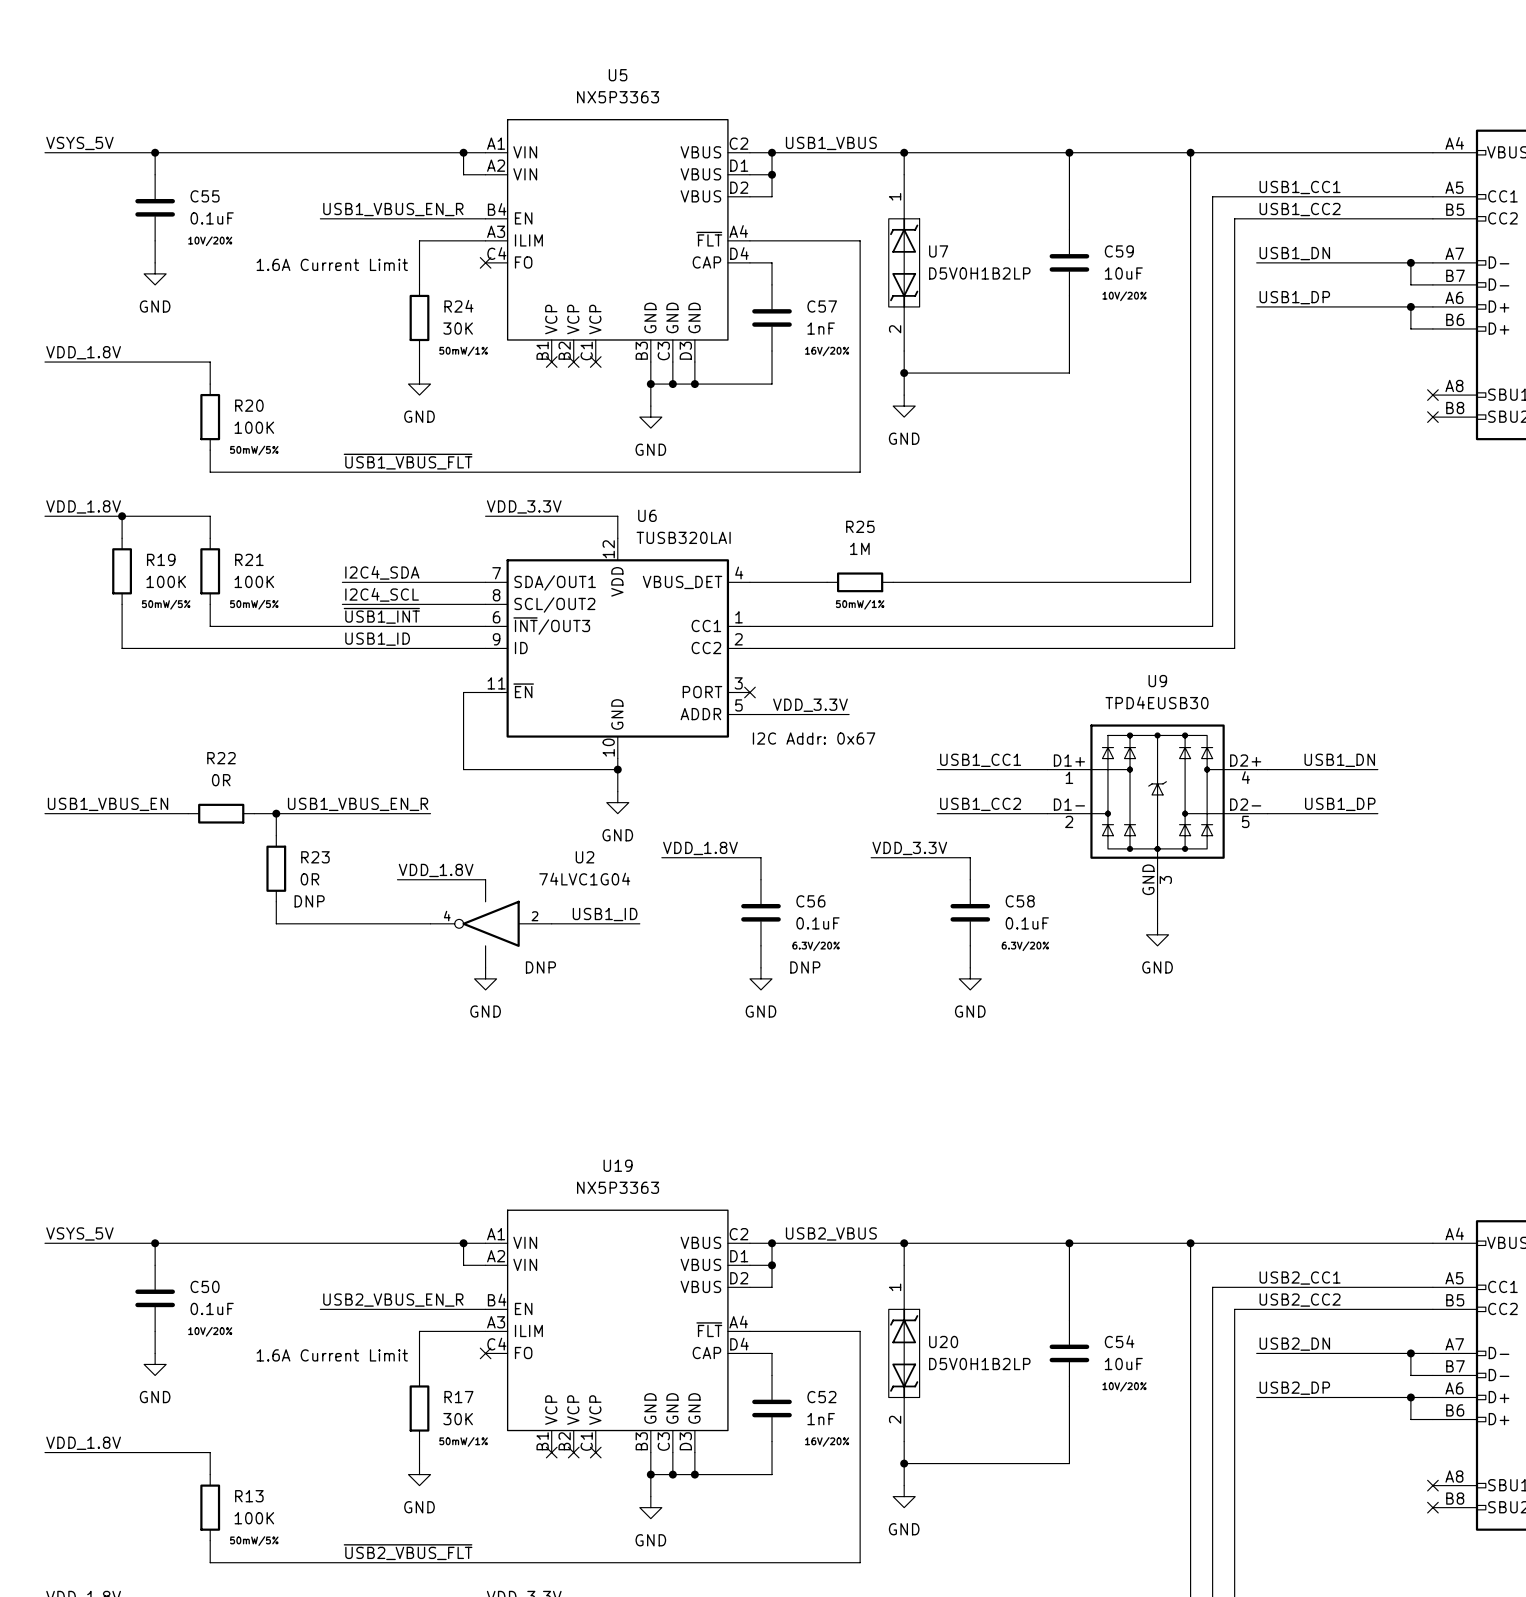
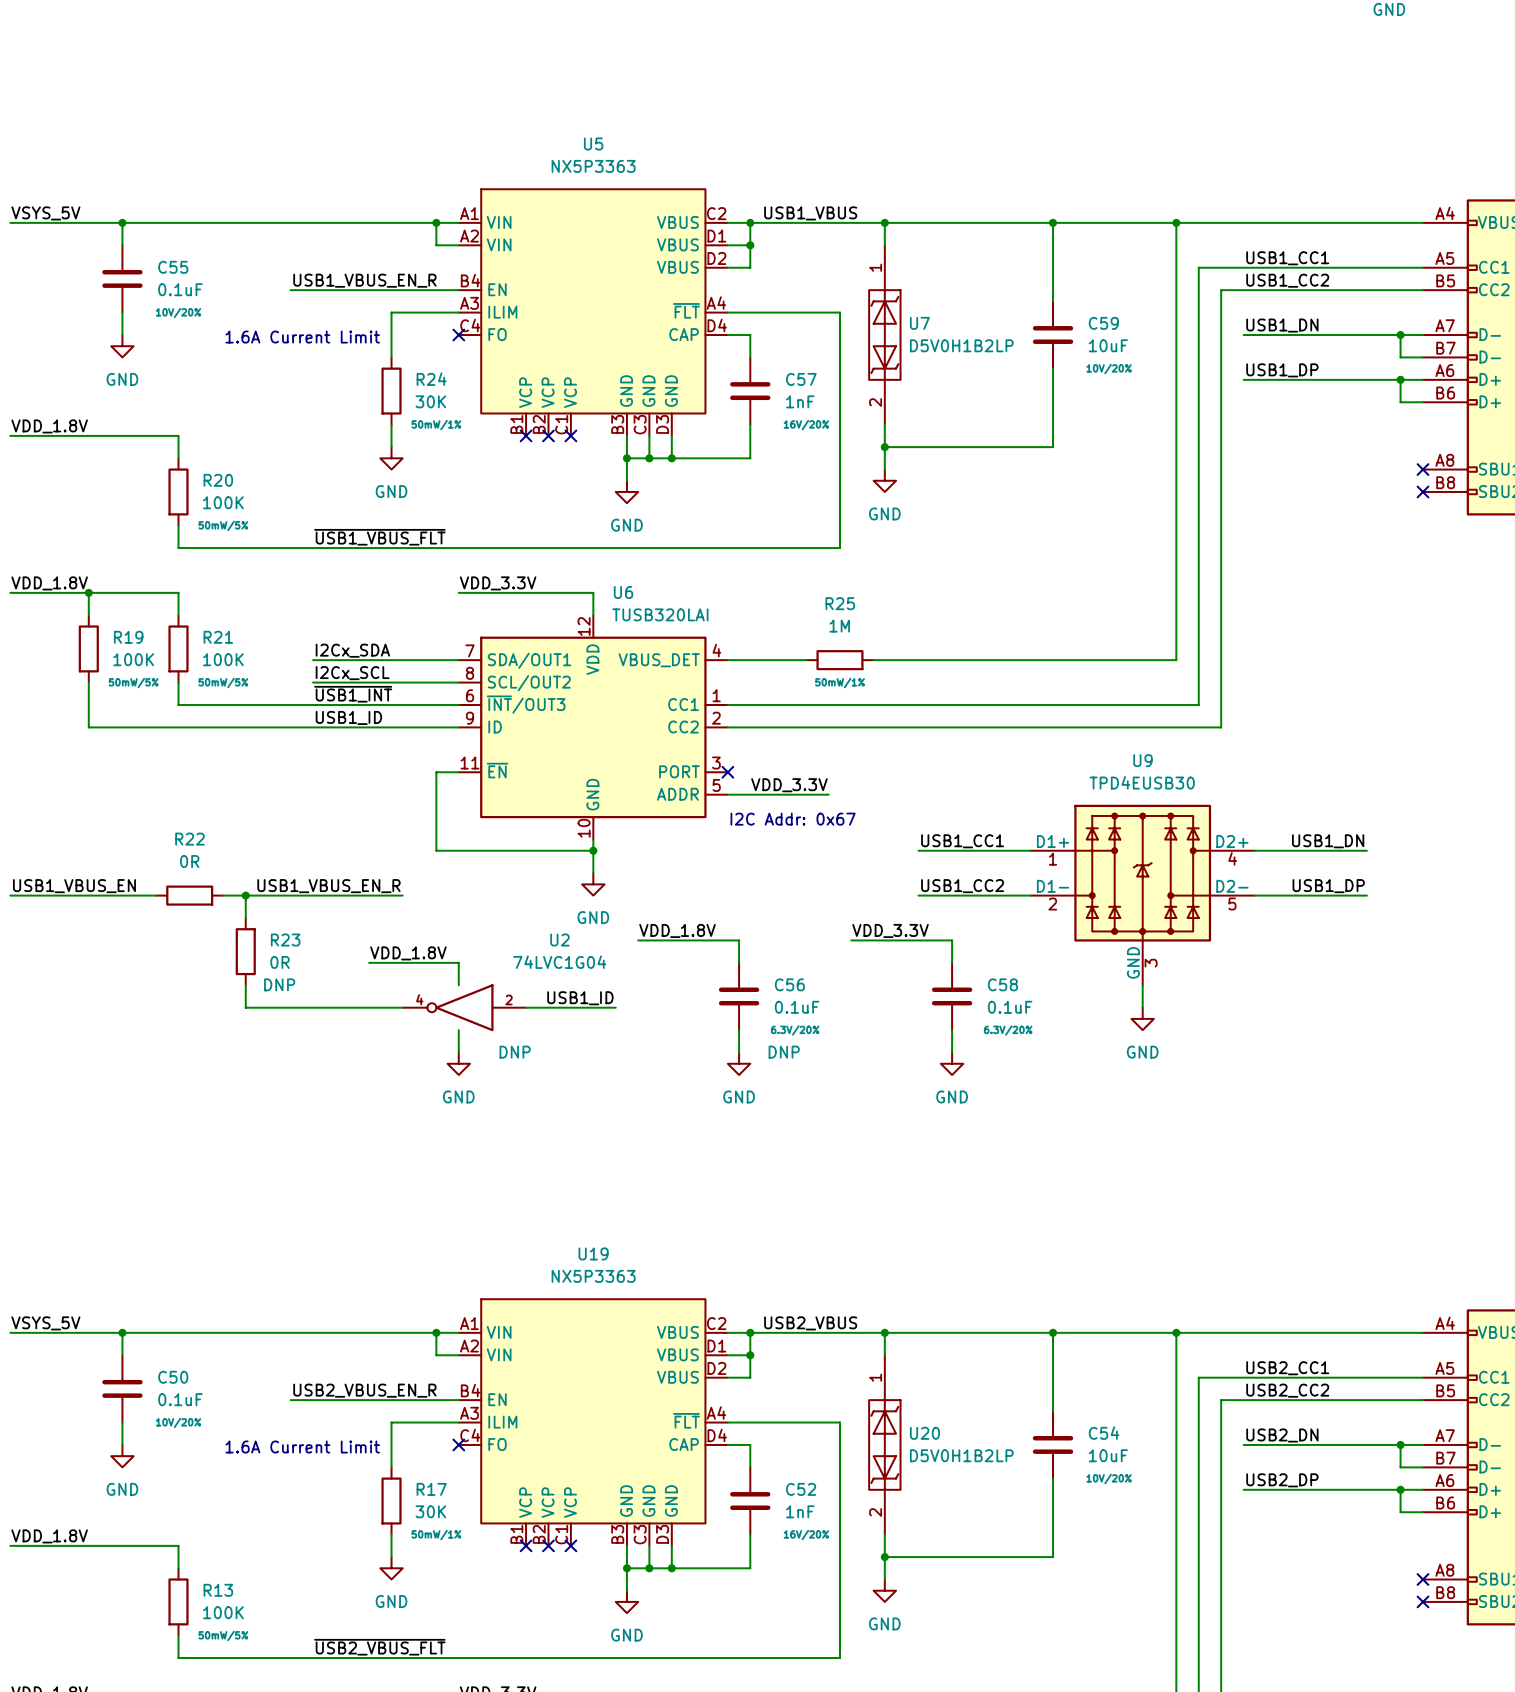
label: I2C4_SDA (382, 572) -> I2Cx_SDA (352, 650)
label: I2C4_SCL (382, 594) -> I2Cx_SCL (352, 673)

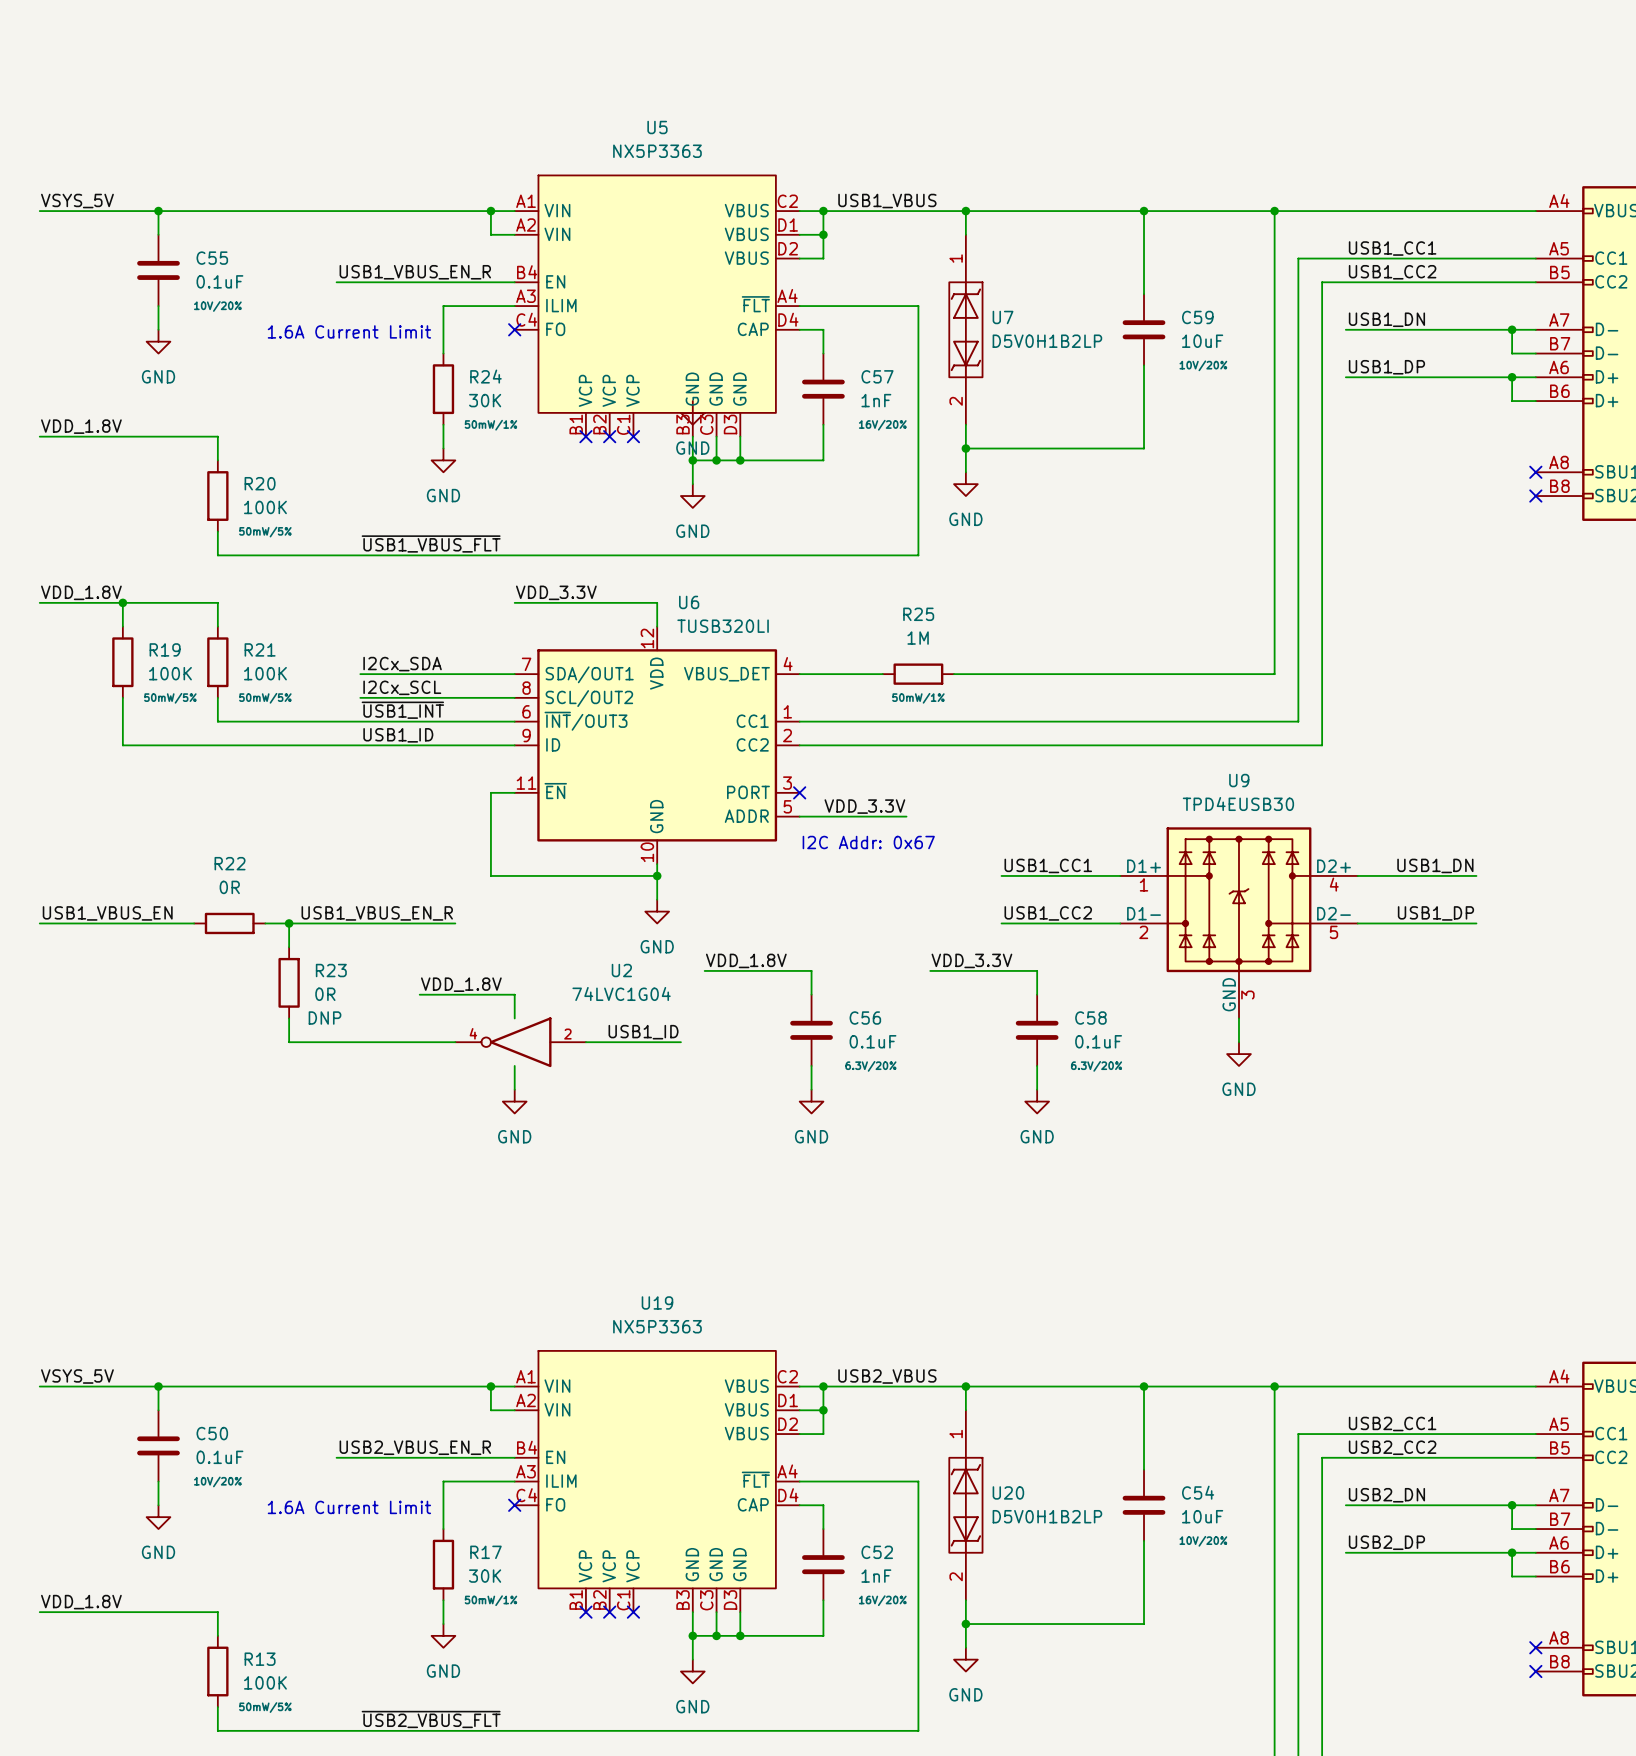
power symbol: none -> GND (692, 412)
U6 value: TUSB320LAI (660, 614) -> TUSB320LI (723, 626)
U2 text: DNP (515, 1052) -> none
C56 text: DNP (784, 1052) -> none

